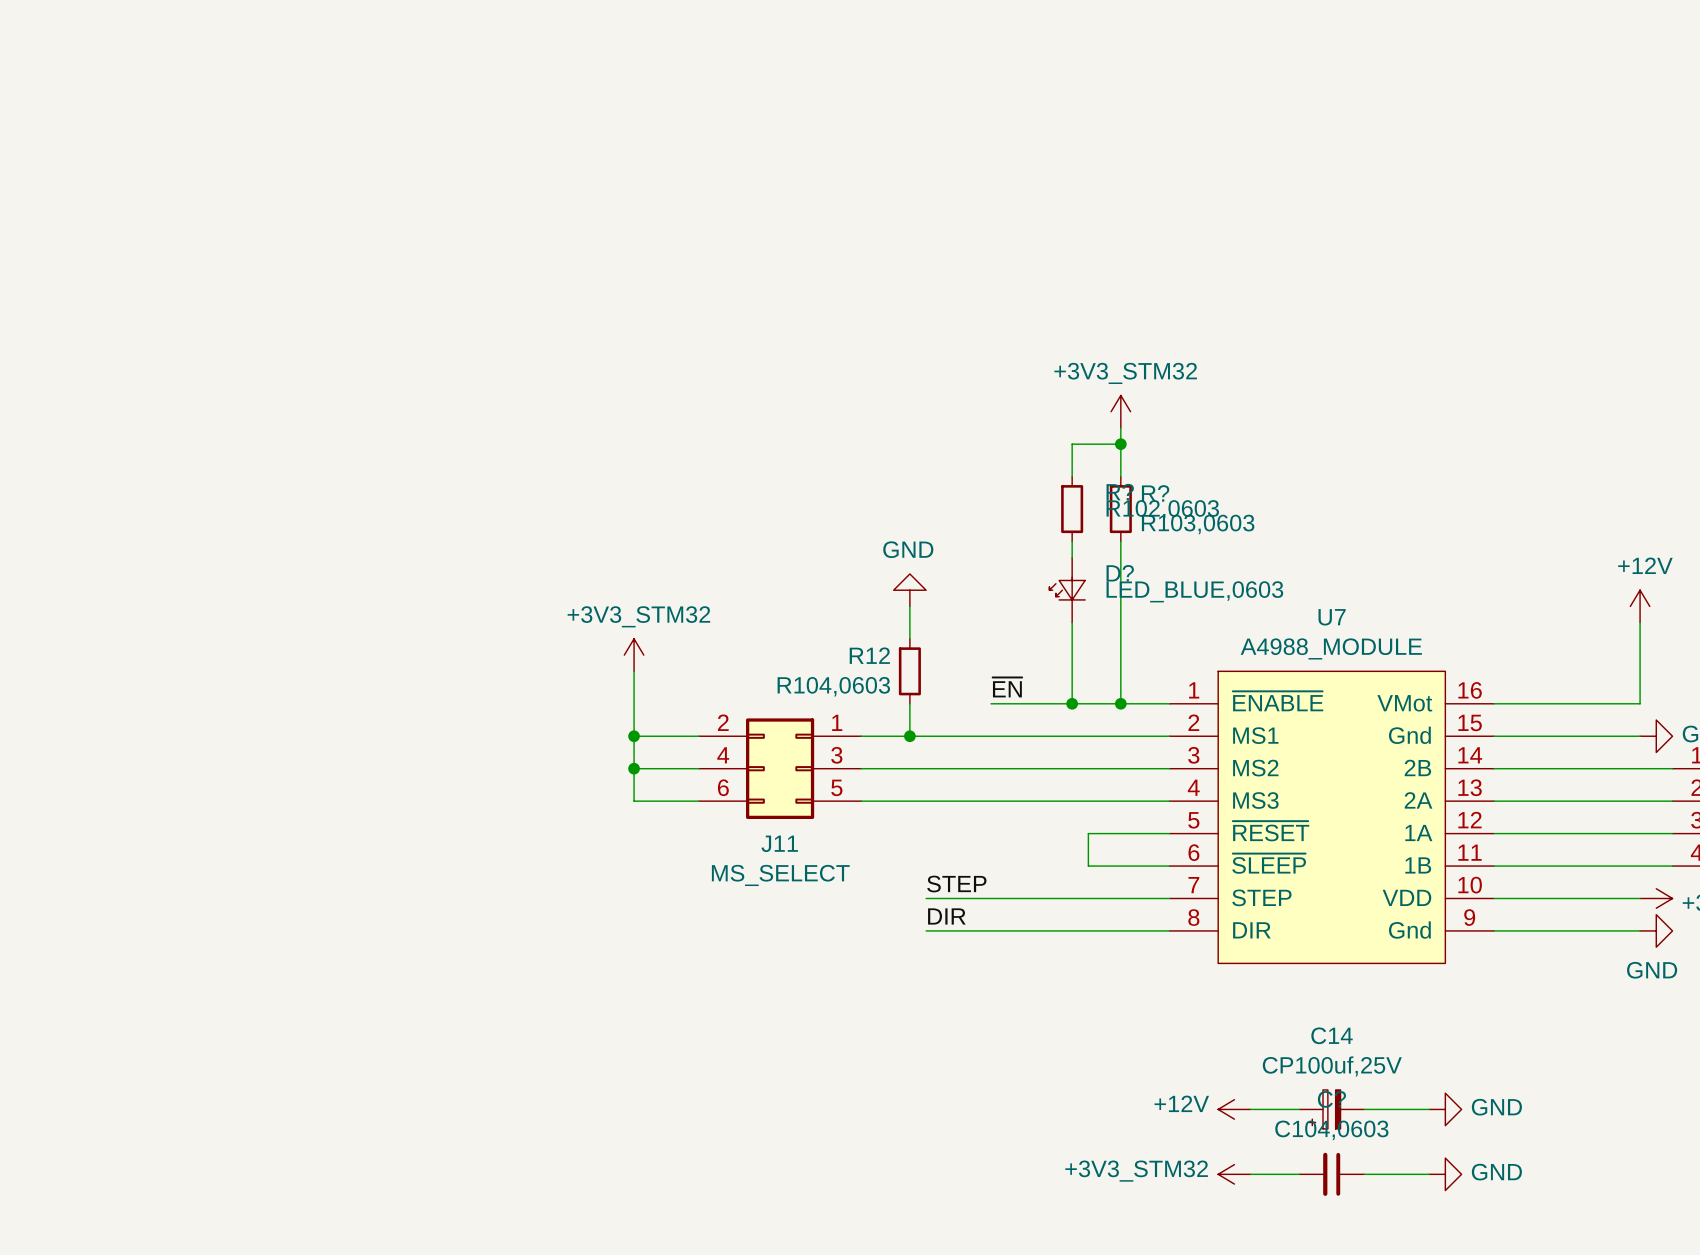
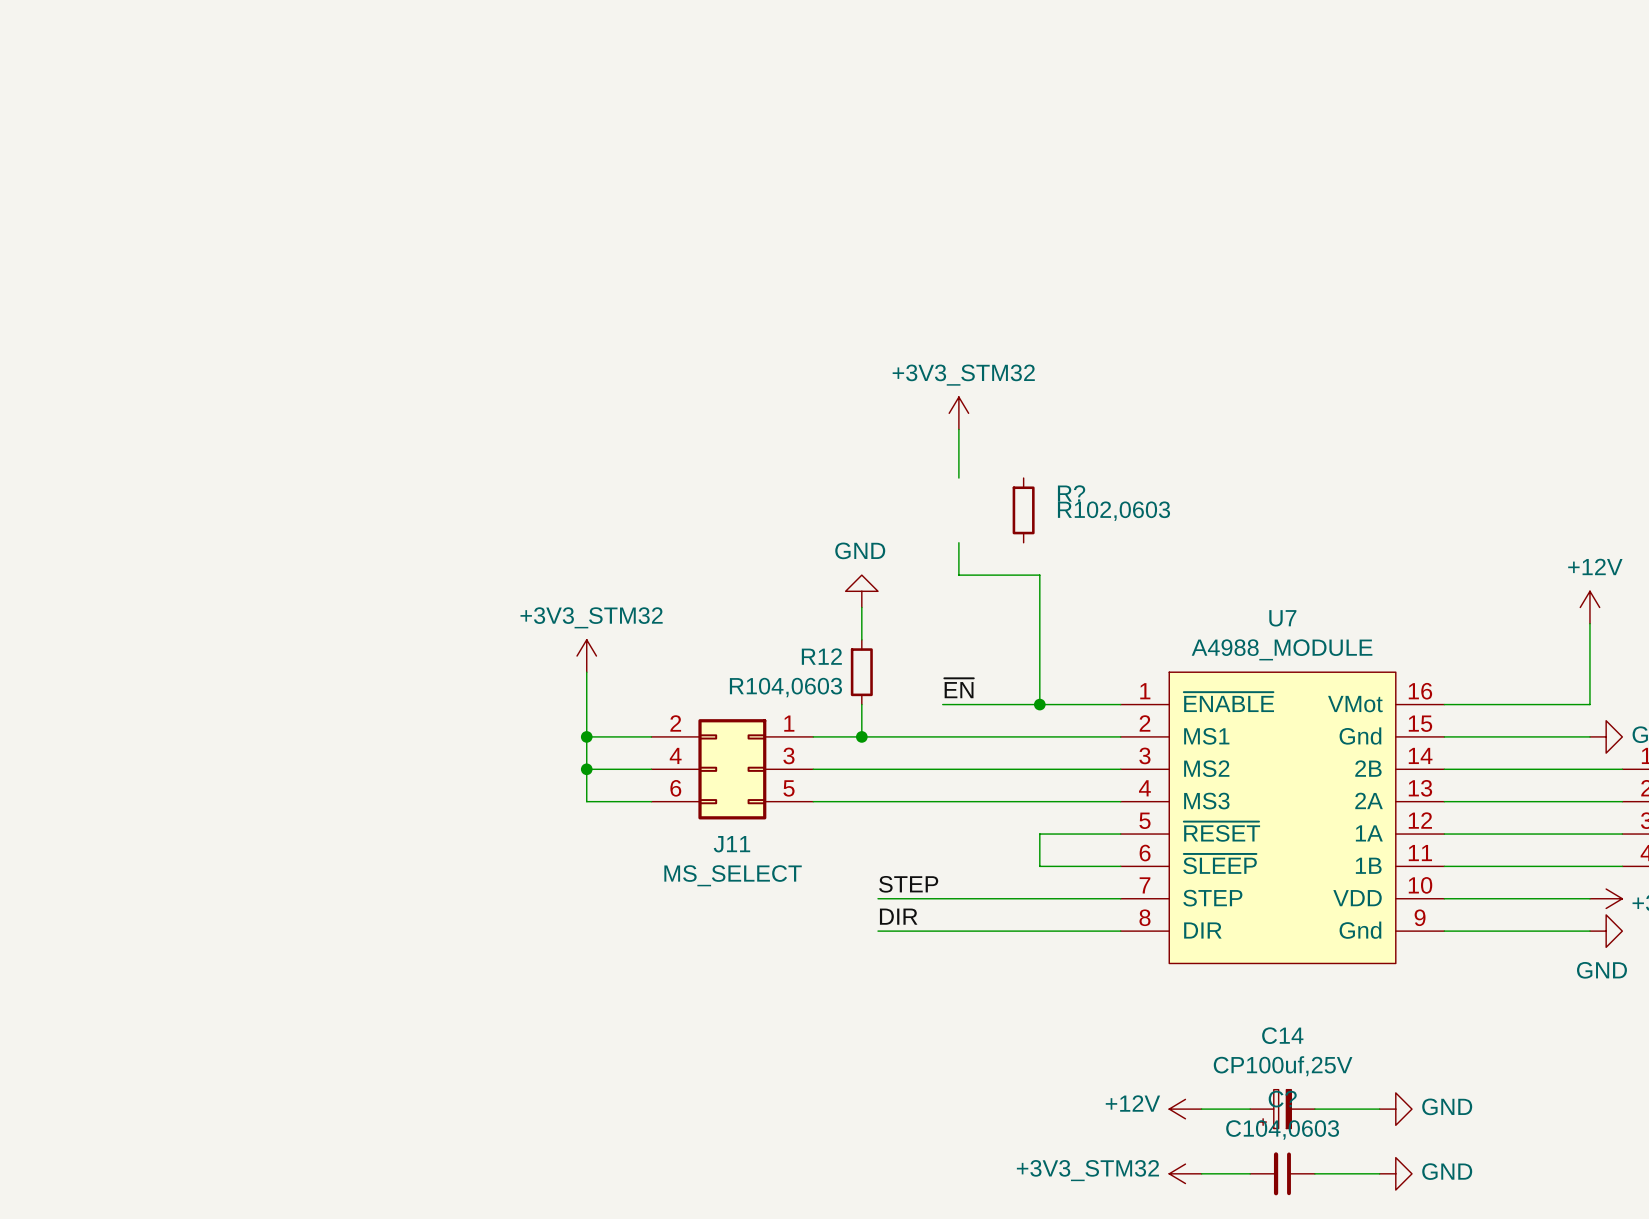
power symbol position: +3V3_STM32 (1120, 411) -> +3V3_STM32 (958, 413)
wire: (1120, 427) (1120, 476) -> (958, 429) (958, 478)
wire: (1120, 444) (1072, 444) (1072, 476) -> none
junction: (1120, 444) -> none
R?: R103,0603 (1120, 509) -> none
wire: none -> (958, 542) (958, 575) (1039, 575) (1039, 704)
wire: (1072, 541) (1072, 557) -> none
wire: (1120, 541) (1120, 703) -> none
D?: LED_BLUE,0603 (1067, 590) -> none
wire: (1072, 622) (1072, 703) -> none
junction: (1072, 703) -> none
junction: none -> (1039, 704)
junction: (1120, 703) -> none

